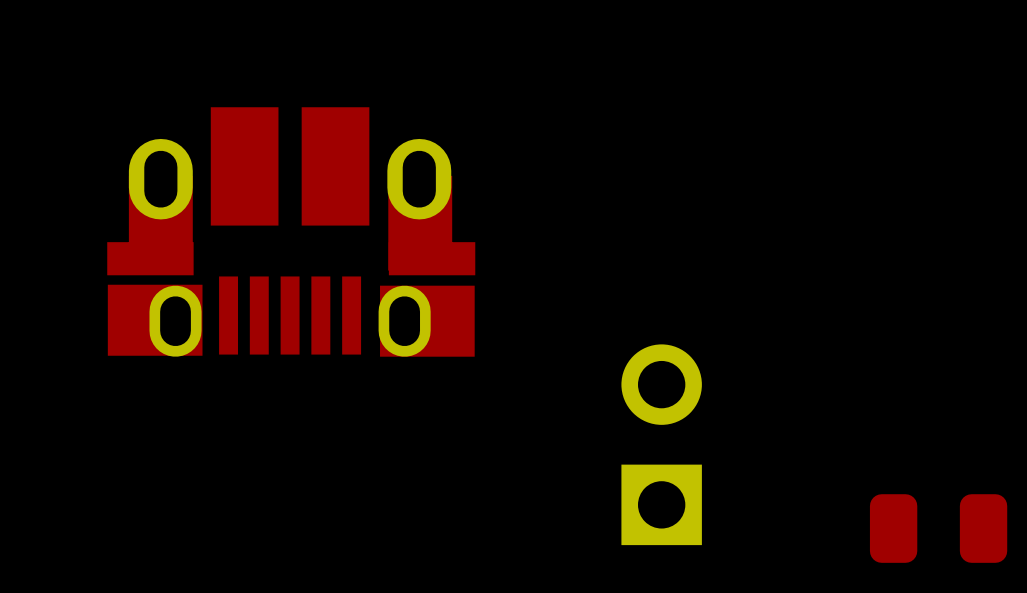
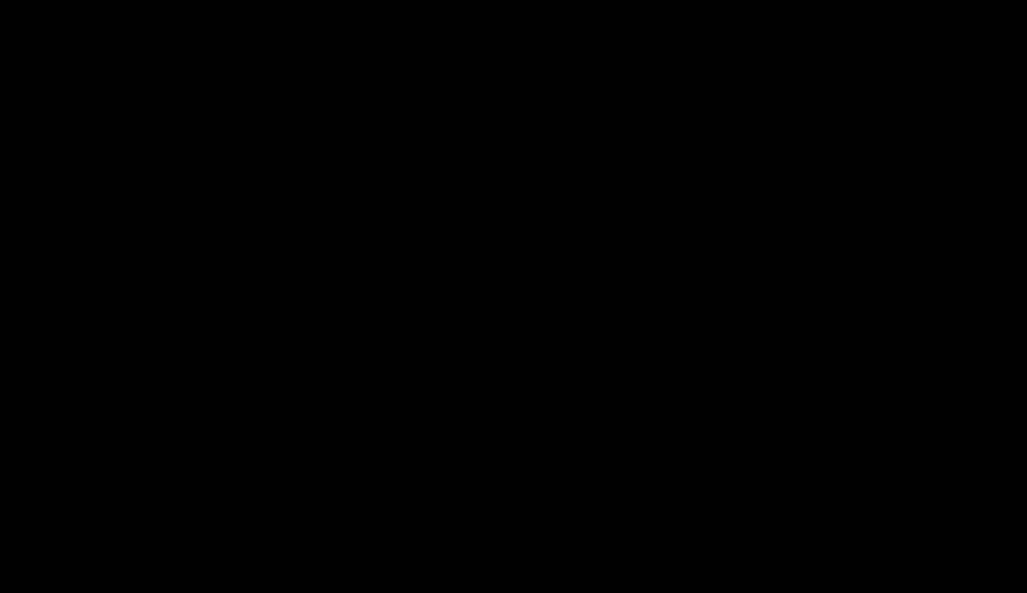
part: (291, 231) -> none
part: (661, 444) -> none
part: (938, 528) -> none

